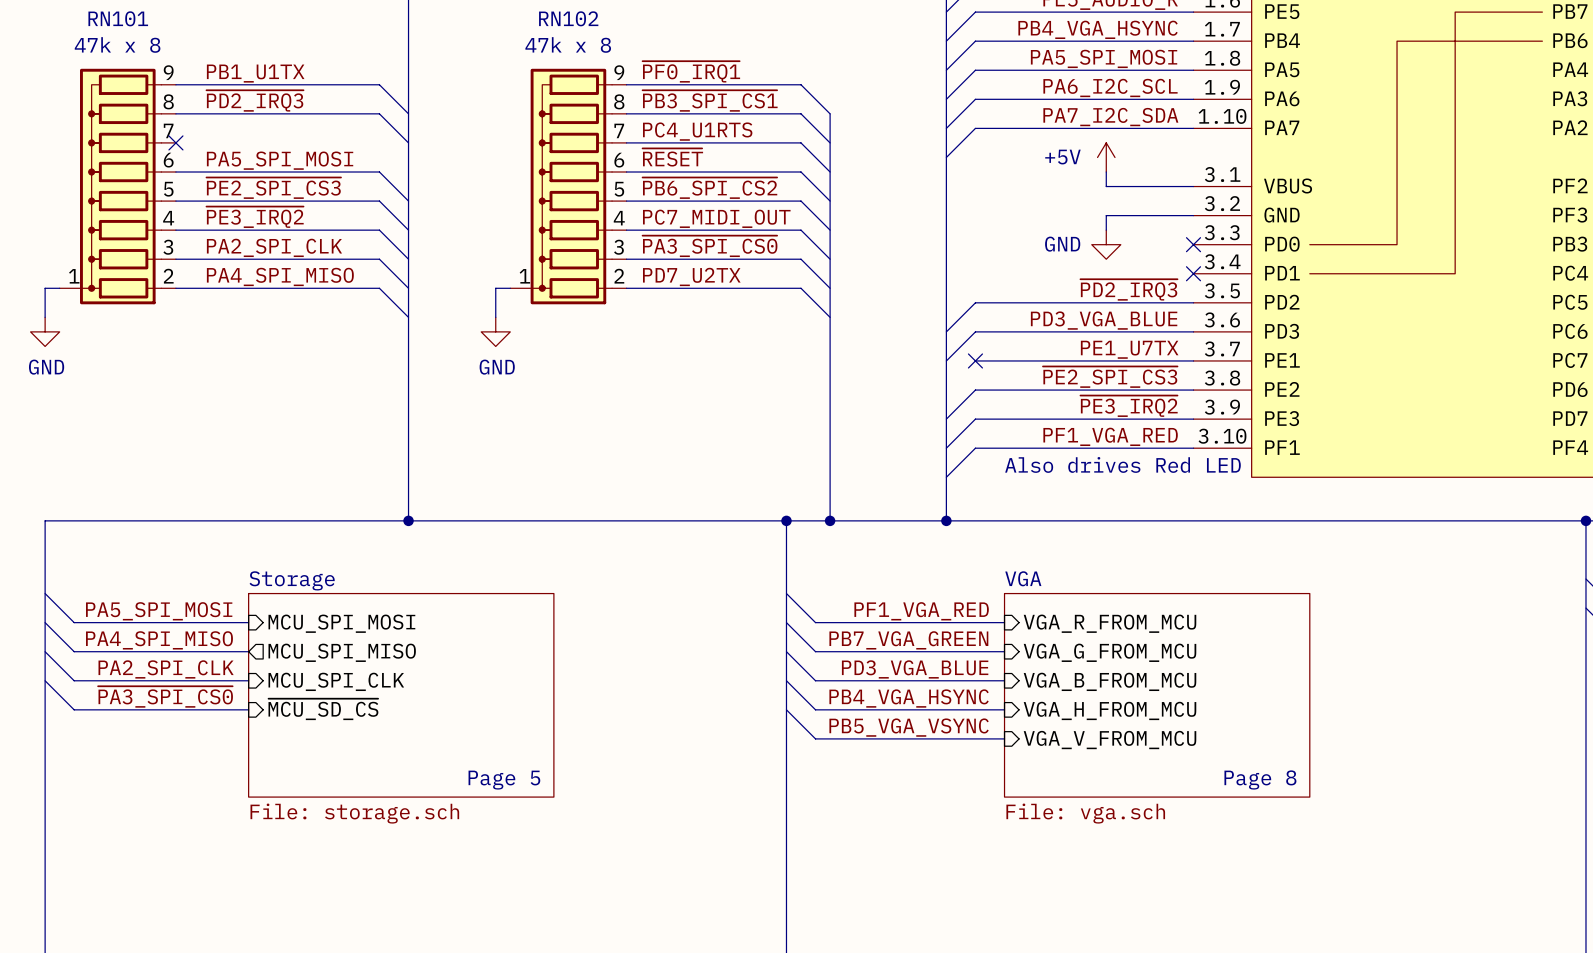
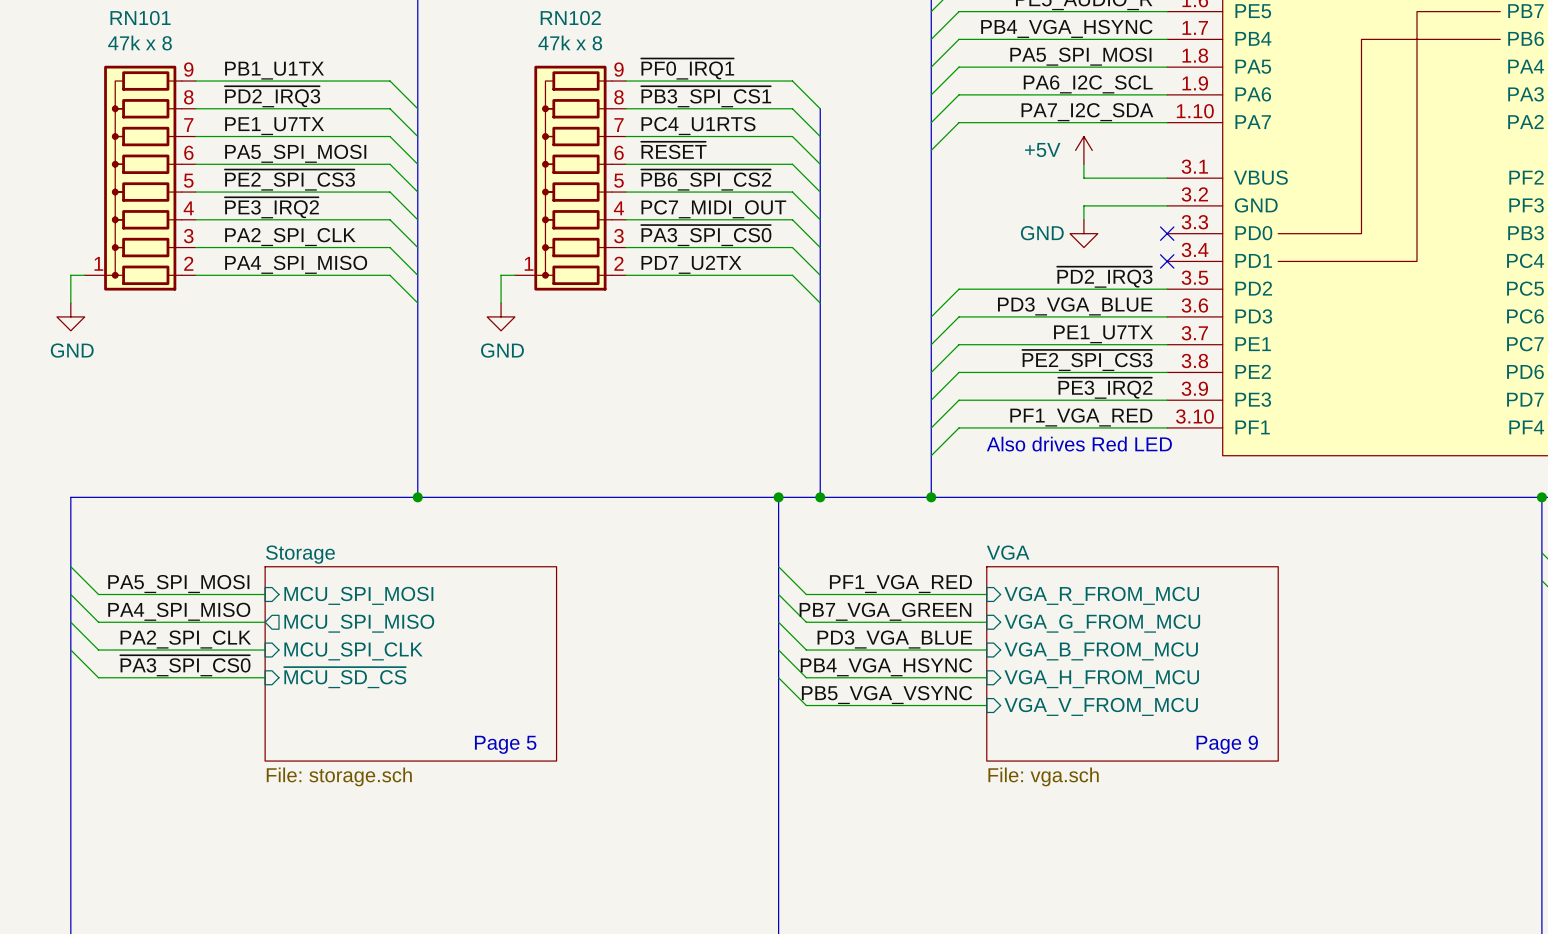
label: none -> PE1_U7TX (274, 126)
wire: none -> (195, 136) (390, 136) (417, 164)
no-connect mark: (175, 142) -> none
wire: none -> (959, 344) (931, 372)
no-connect mark: (975, 360) -> none
text: Page 8 (1260, 779) -> Page 9 (1227, 744)

